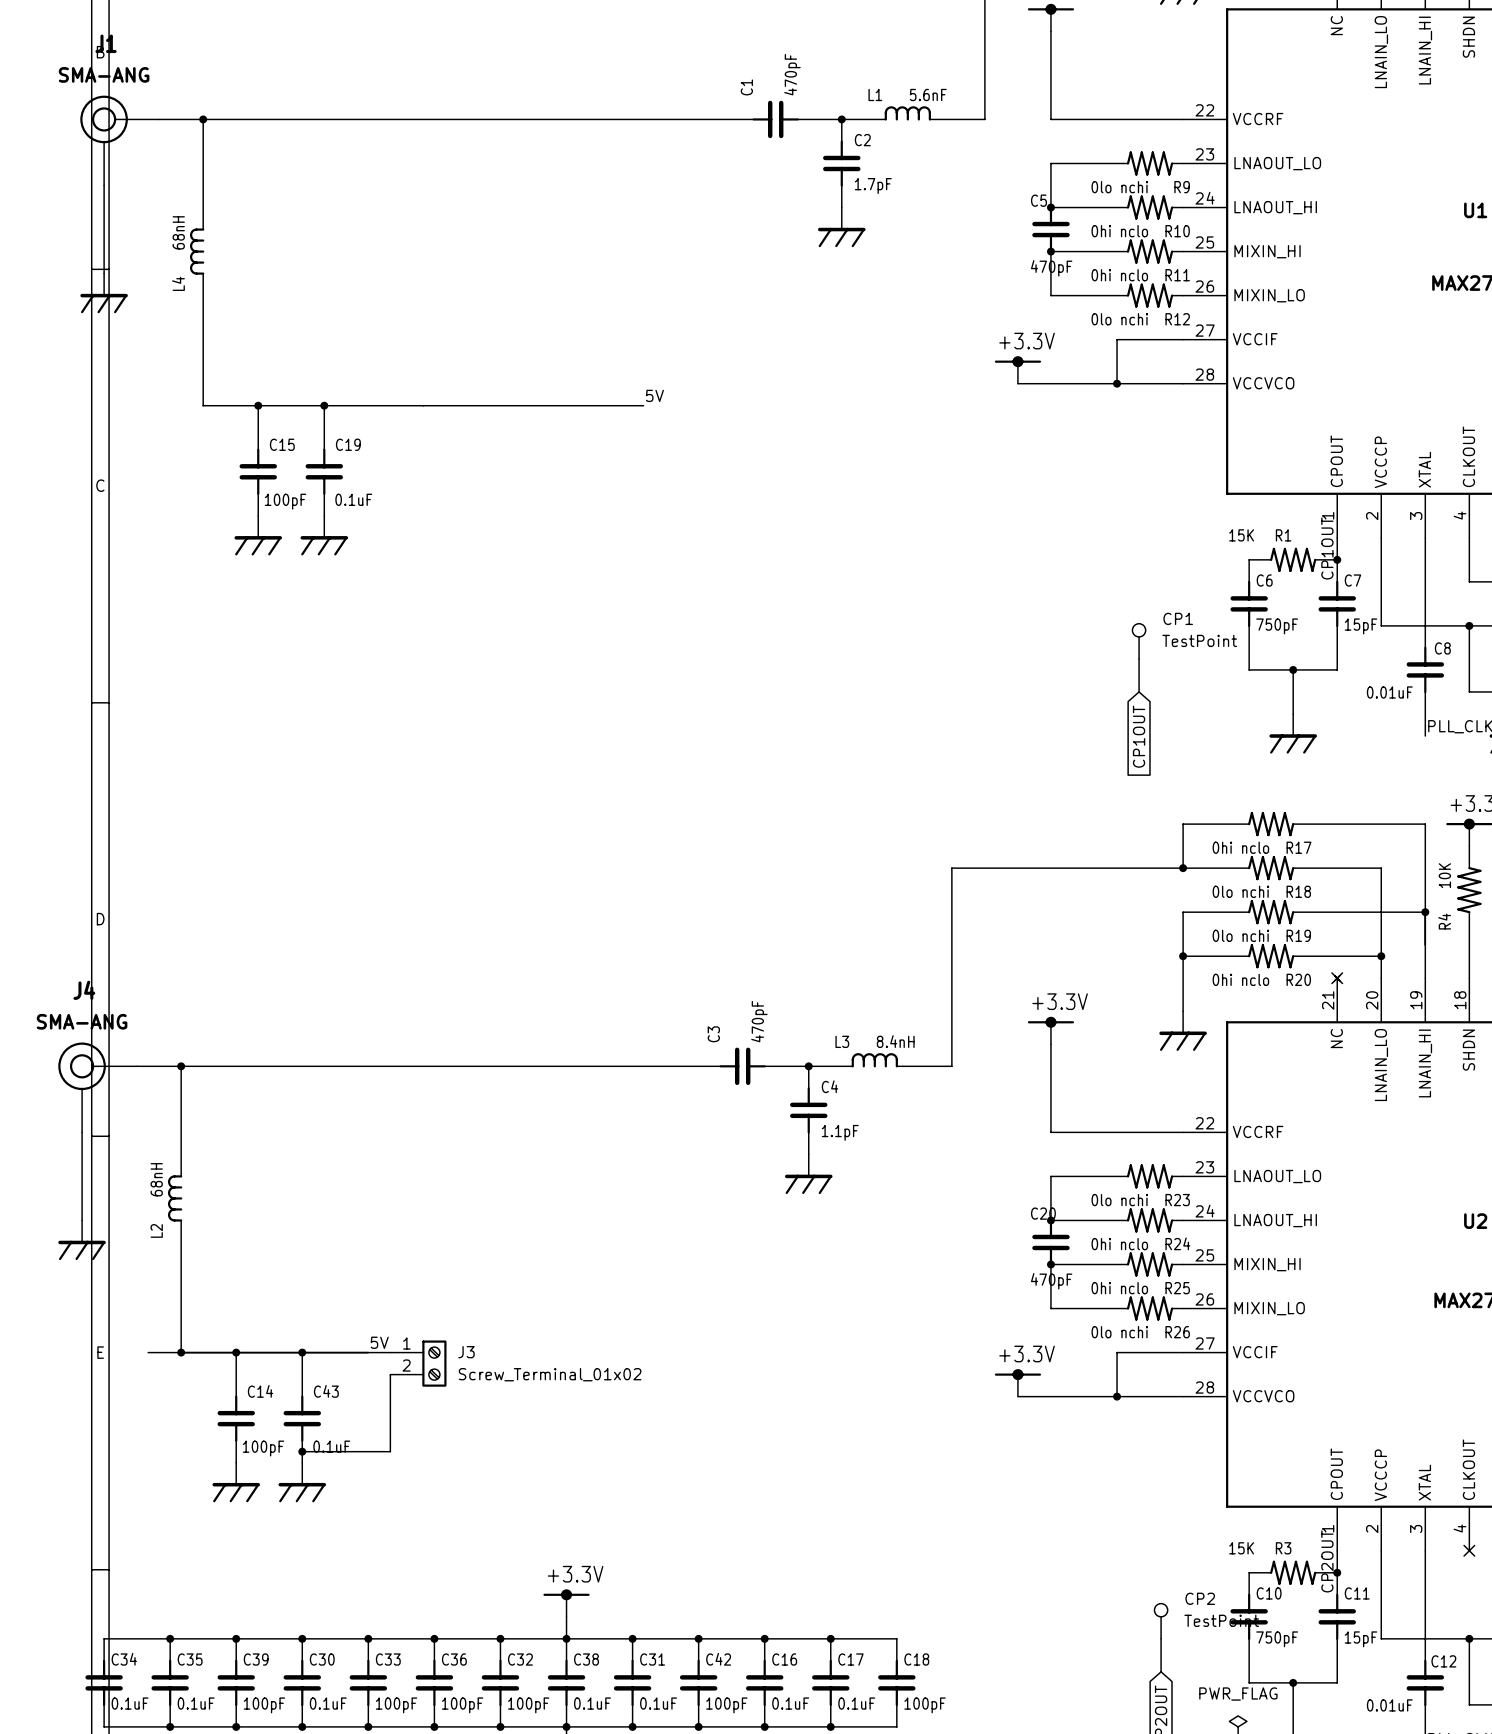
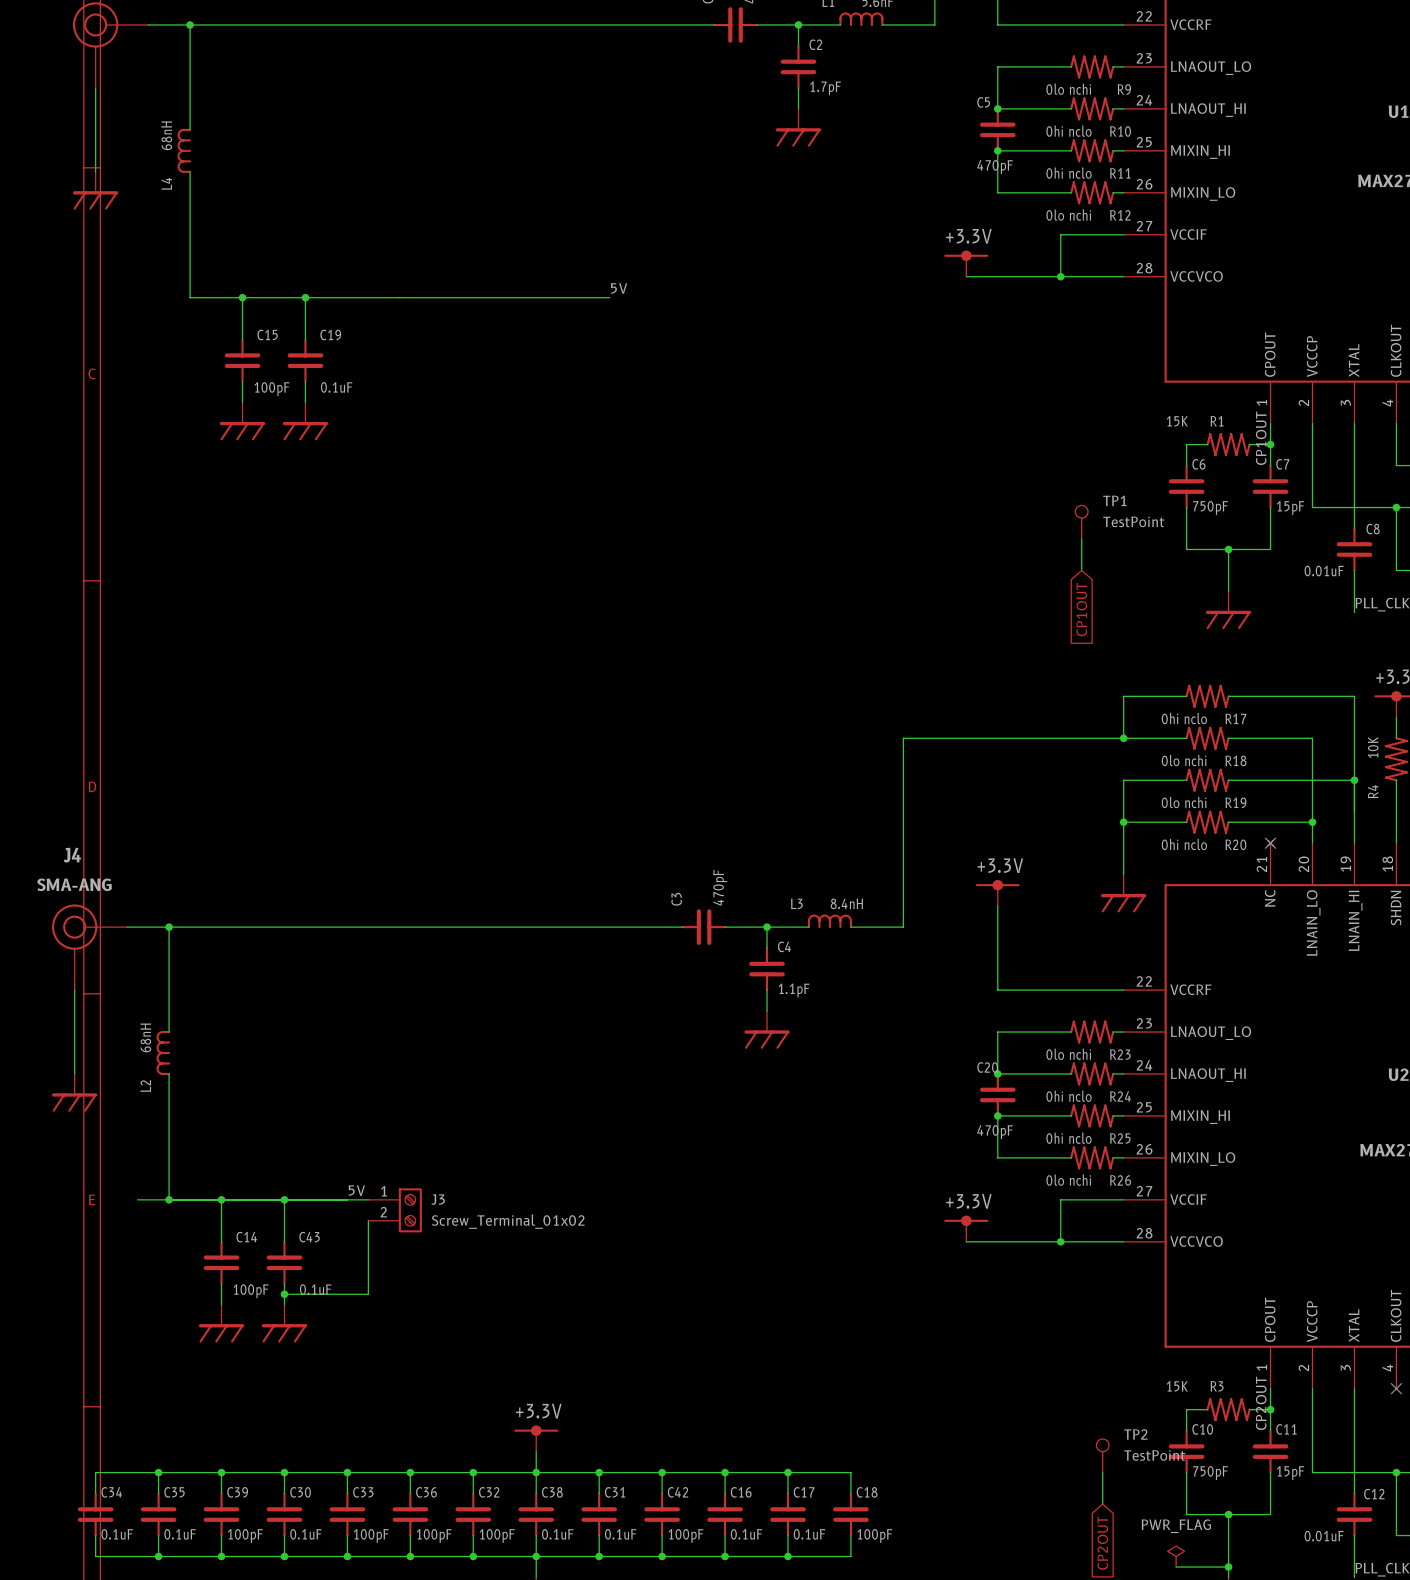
CP1 name: CP1 (1178, 618) -> TP1 (1114, 500)
CP2 name: CP2 (1200, 1598) -> TP2 (1135, 1434)

